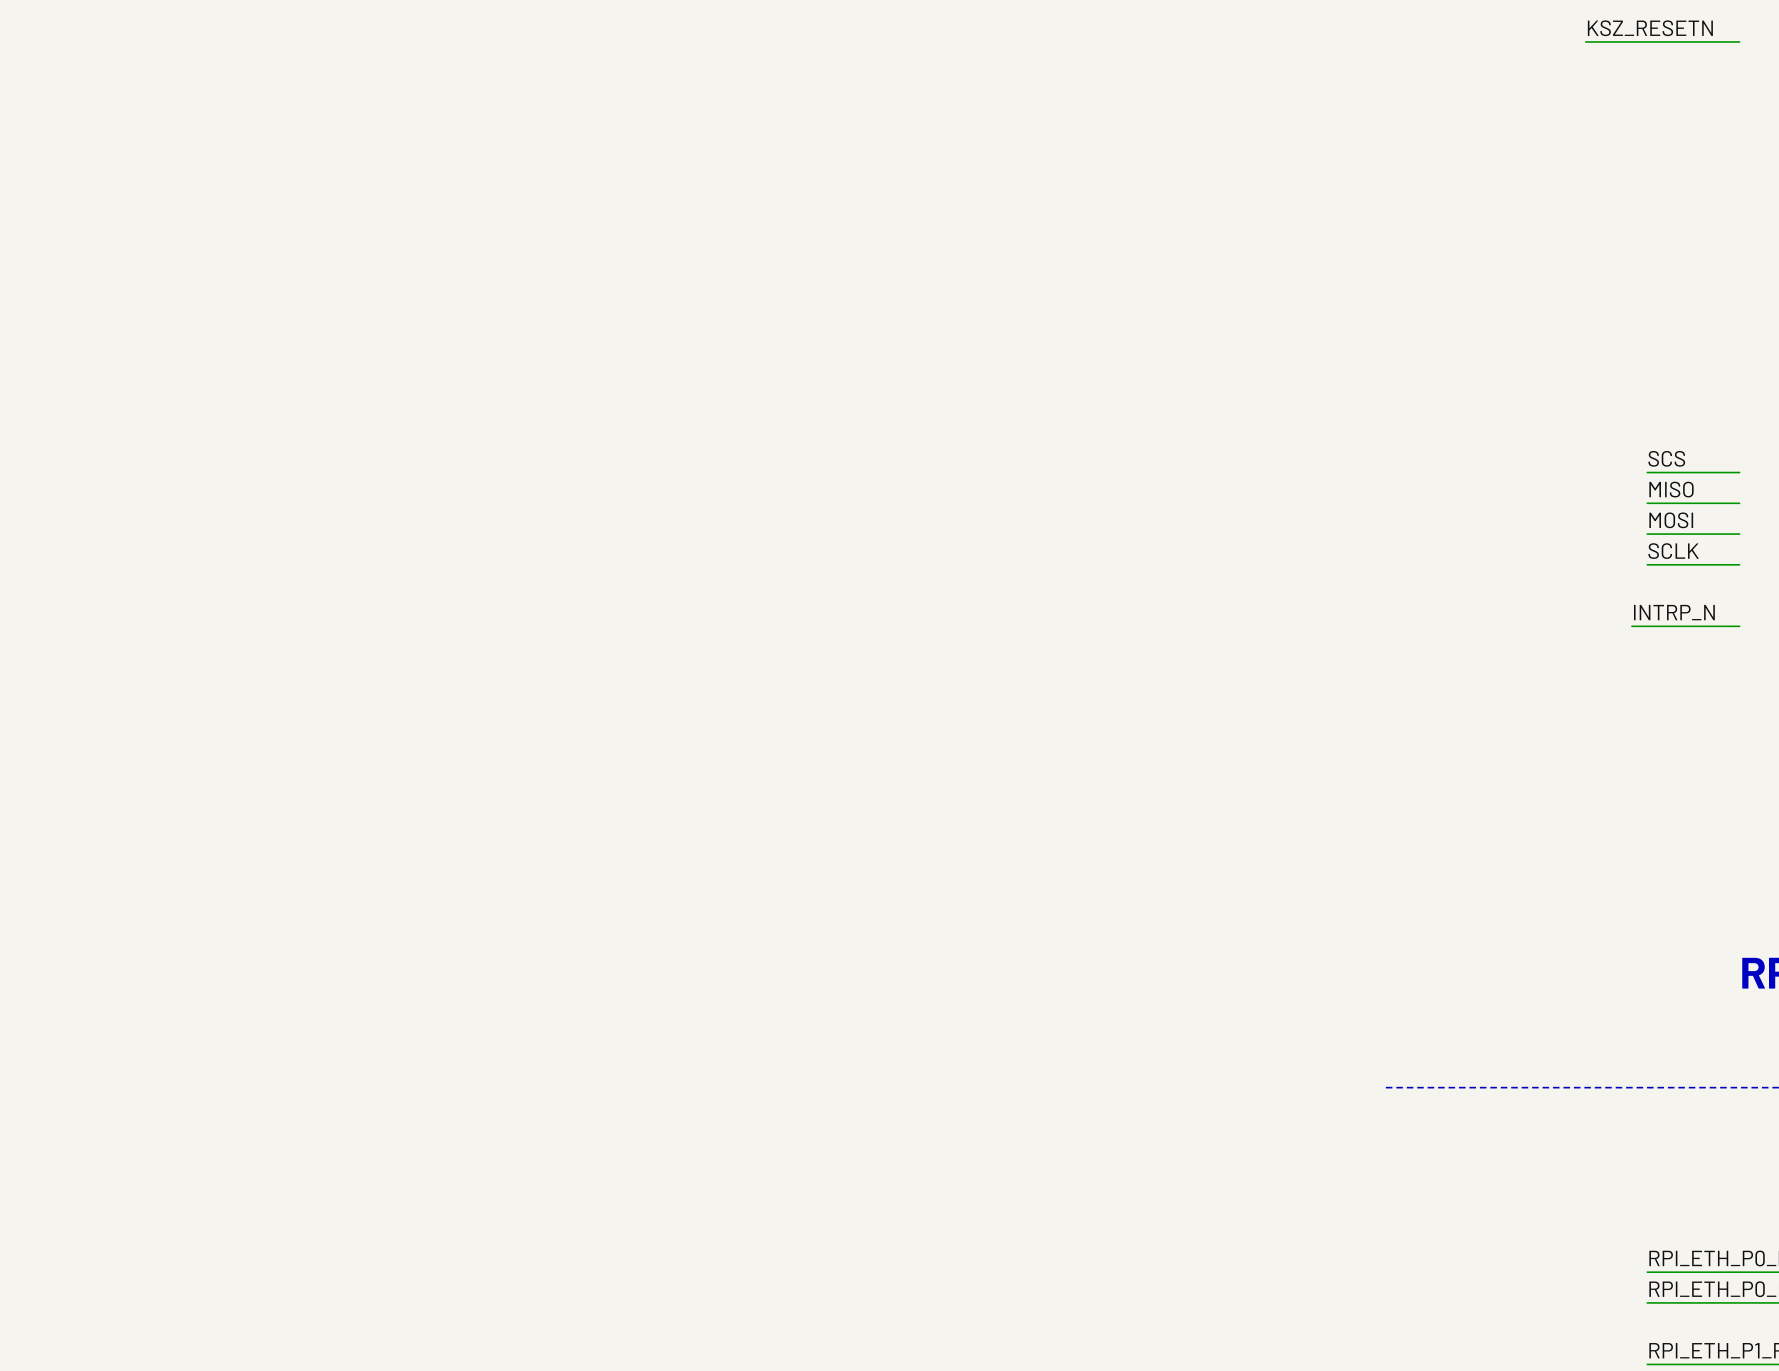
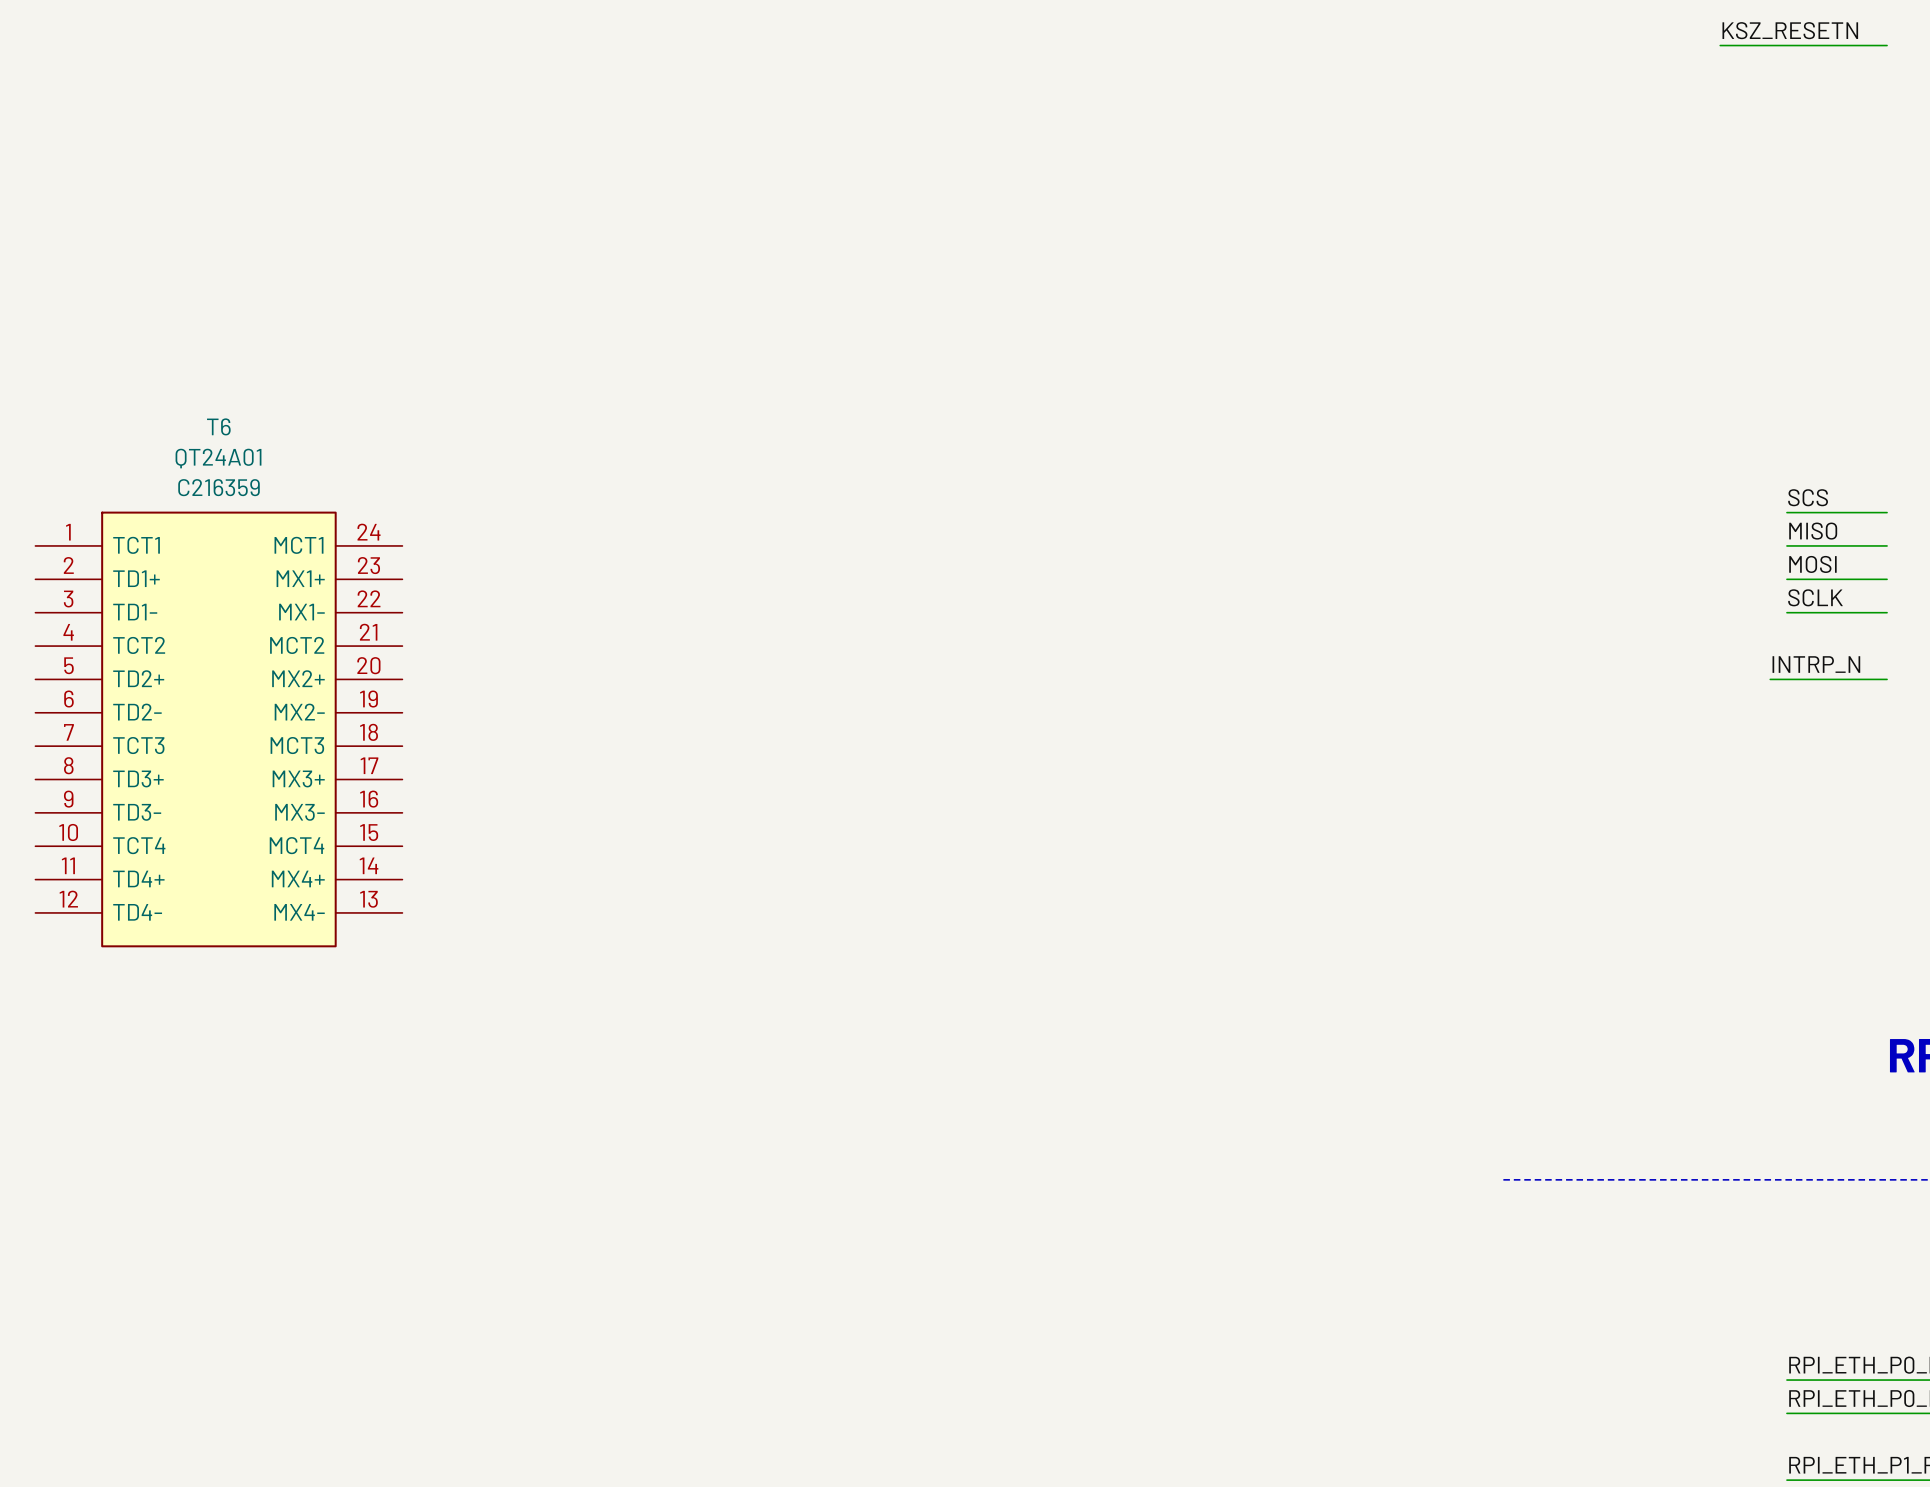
T6: none -> QT24A01 (218, 729)

